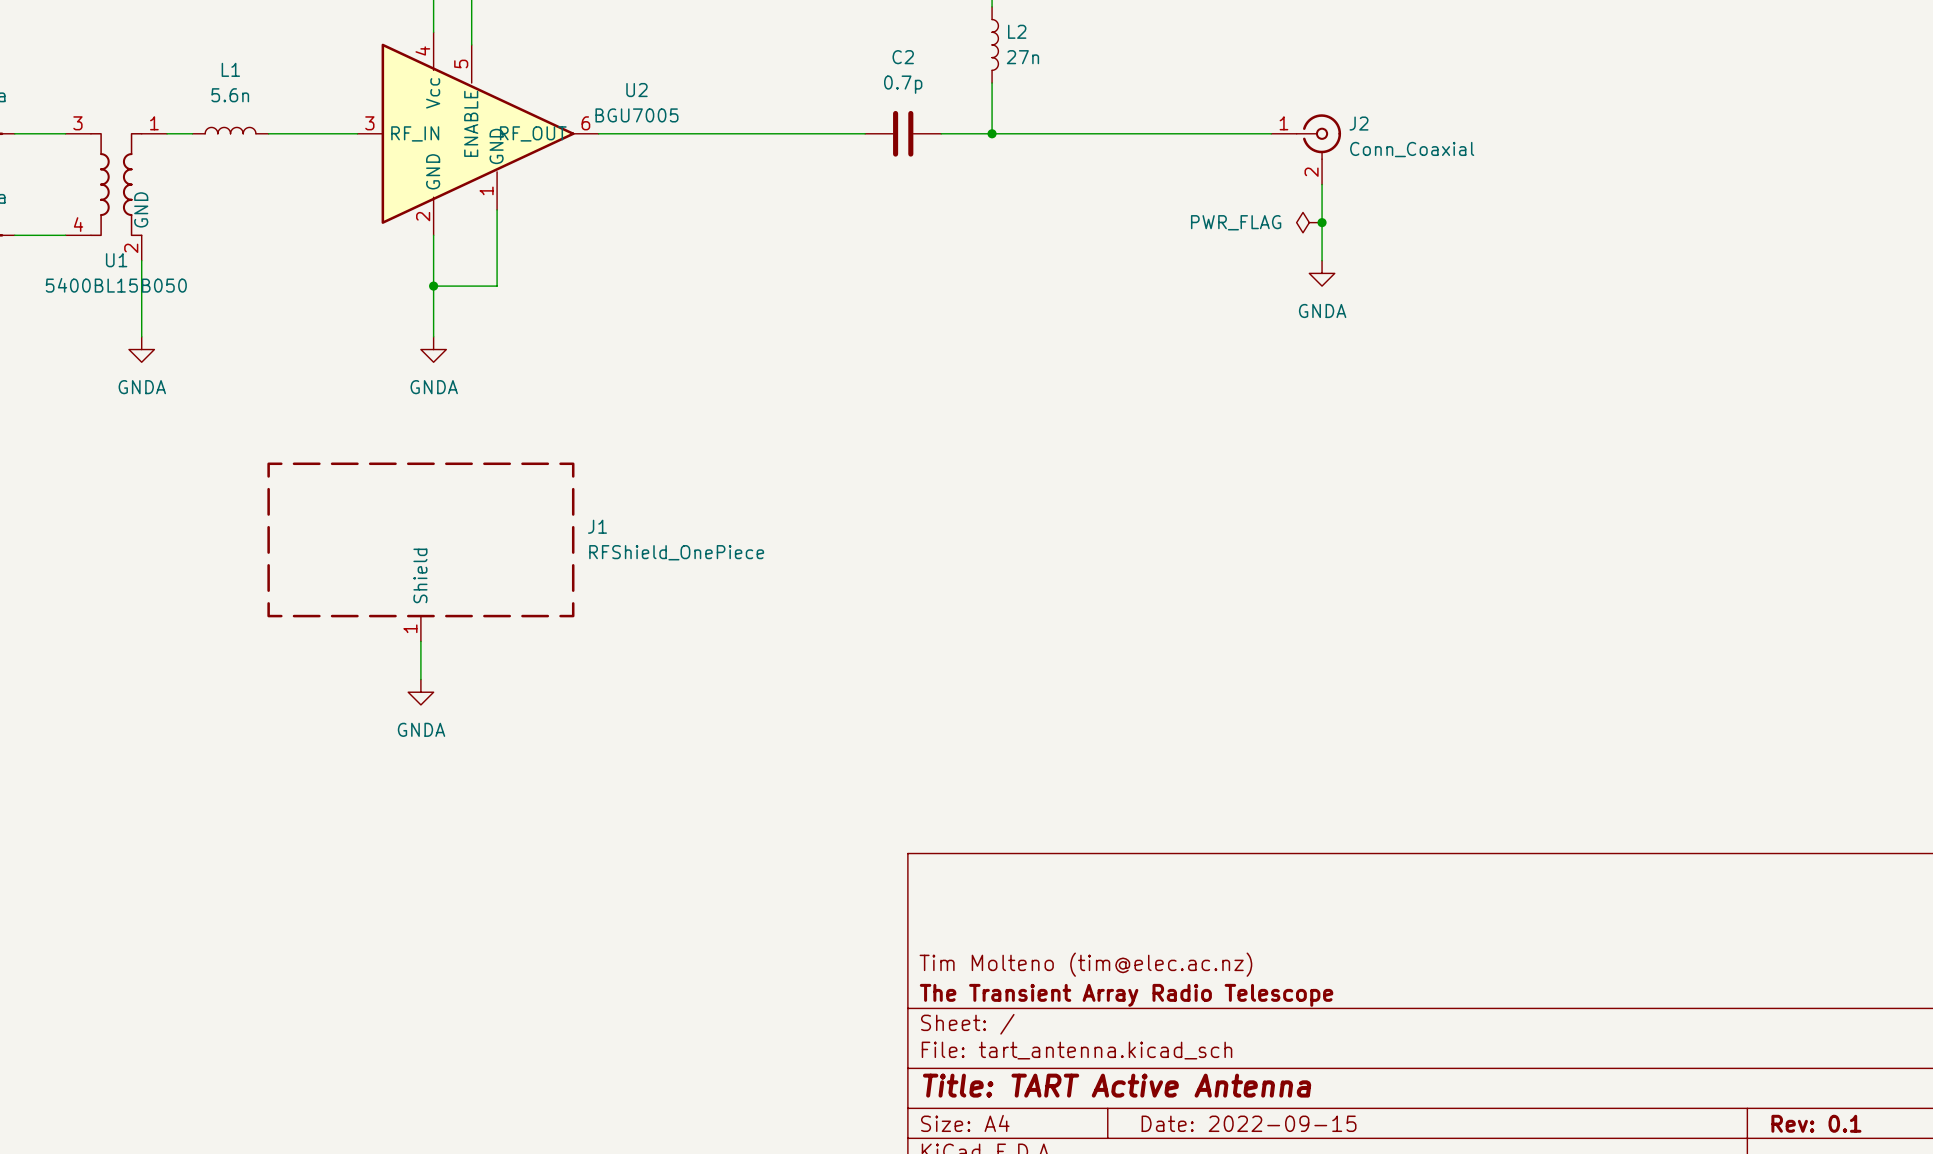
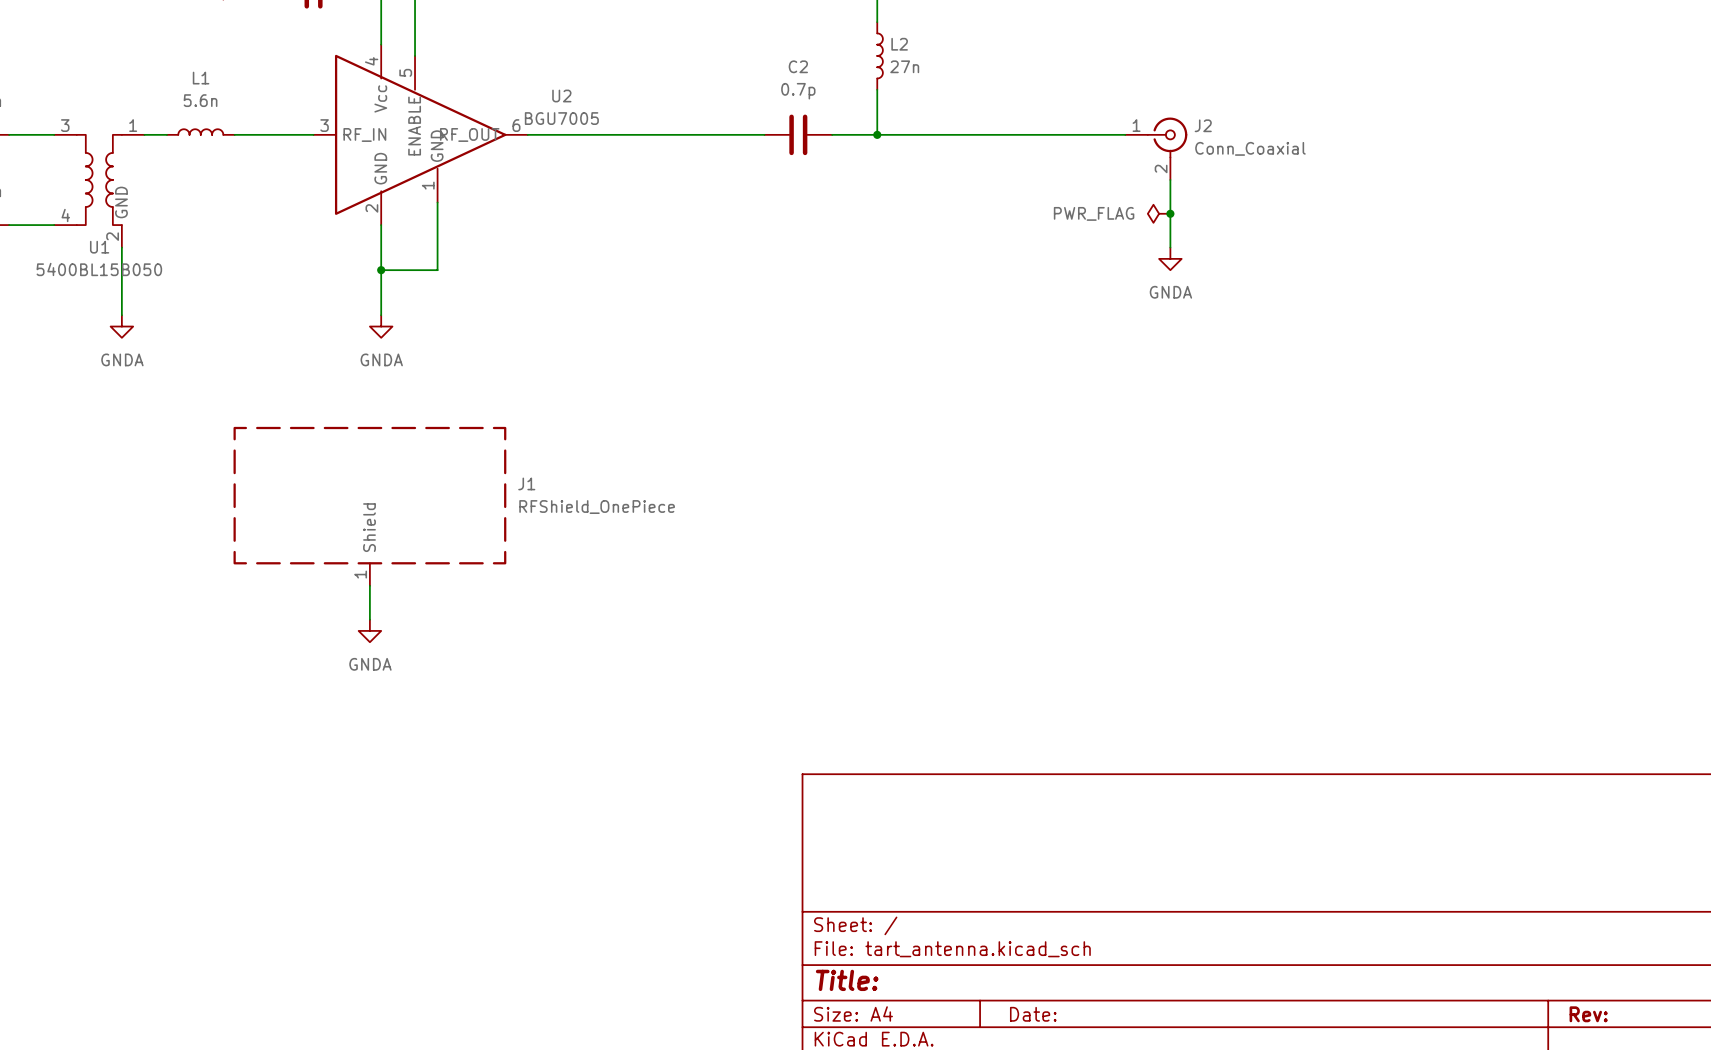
title block: Tim Molteno (tim@elec.ac.nz) (1085, 964) -> none
title block: The Transient Array Radio Telescope (1126, 995) -> none
title block: Title: TART Active Antenna (1117, 1085) -> Title: (847, 980)
title block: Date: 2022-09-15 (1249, 1123) -> Date: (1033, 1014)
title block: Rev: 0.1 (1816, 1123) -> Rev: (1588, 1014)

